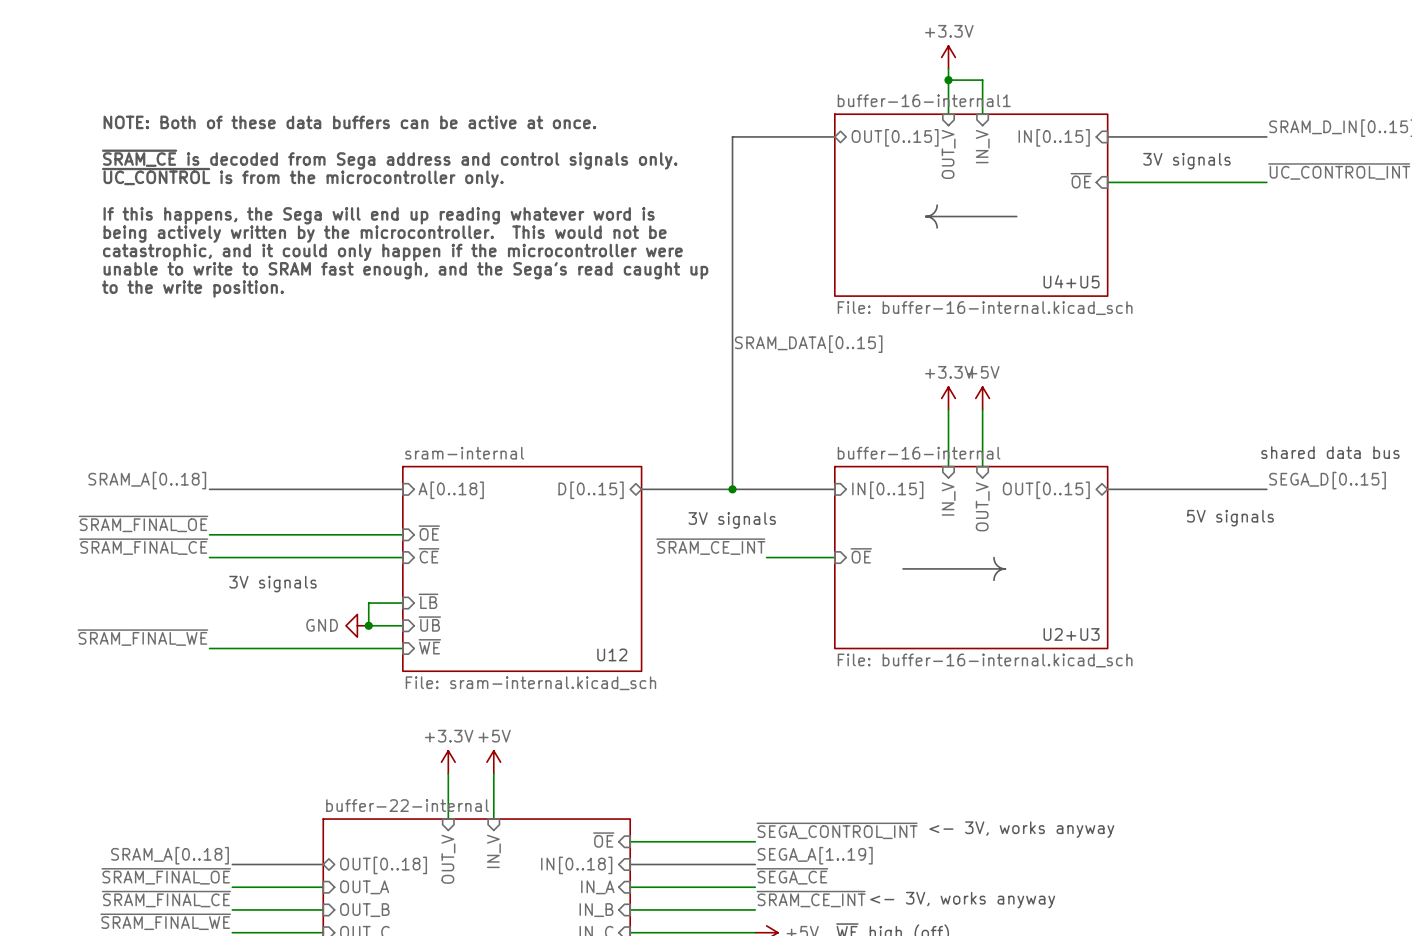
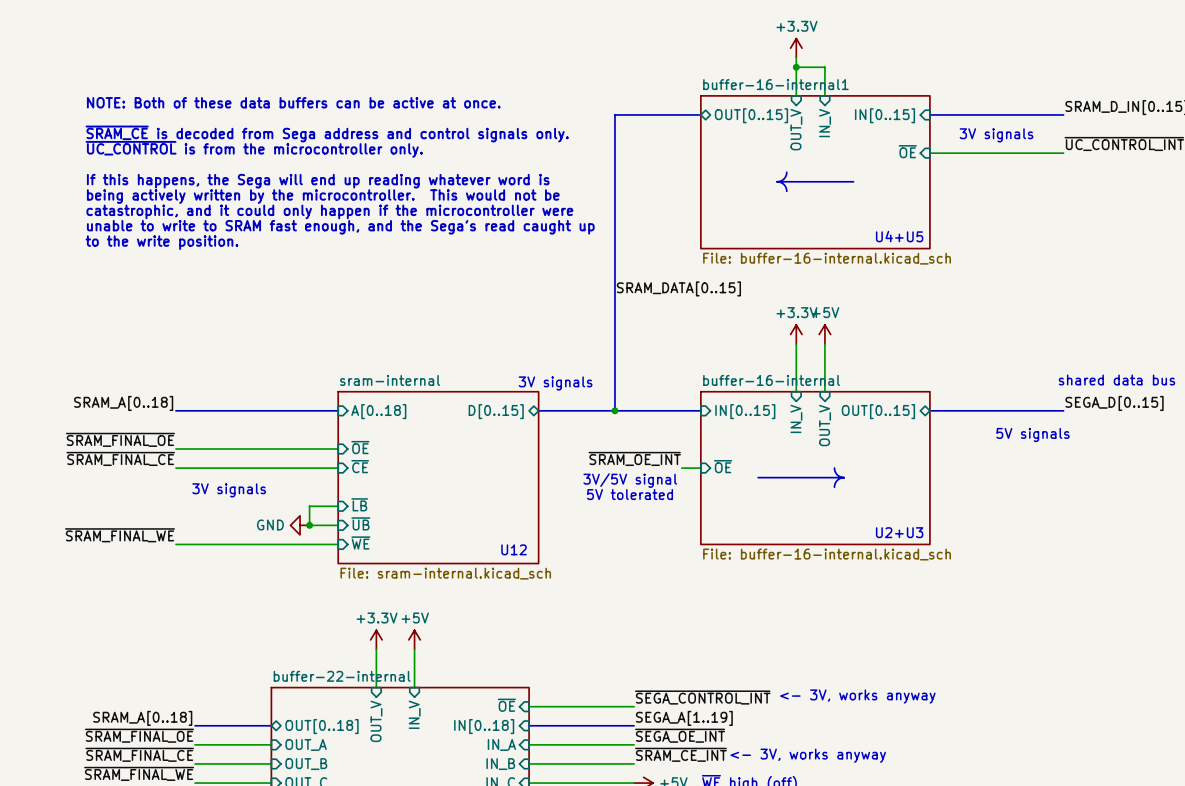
text position: 3V signals (732, 520) -> 3V signals (555, 383)
label: ~{SRAM_CE_INT} (710, 546) -> ~{SRAM_OE_INT} (634, 458)
wire: (766, 557) (812, 557) -> none
text: none -> 3V/5V signal (630, 480)
text: none -> 5V tolerated (630, 494)
label: ~{SEGA_CE} (792, 876) -> ~{SEGA_OE_INT} (680, 735)

